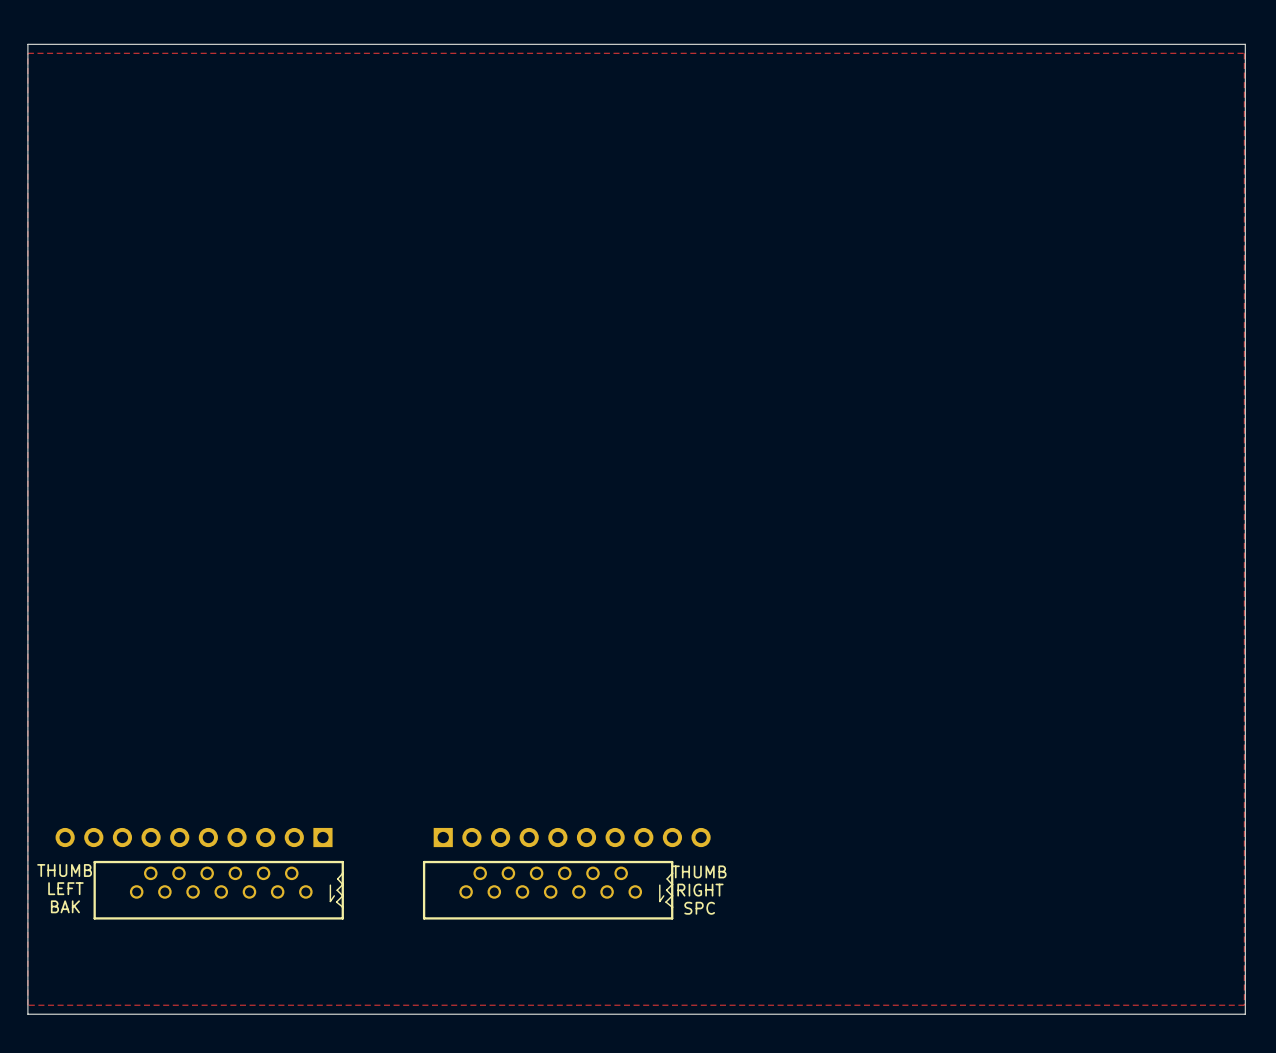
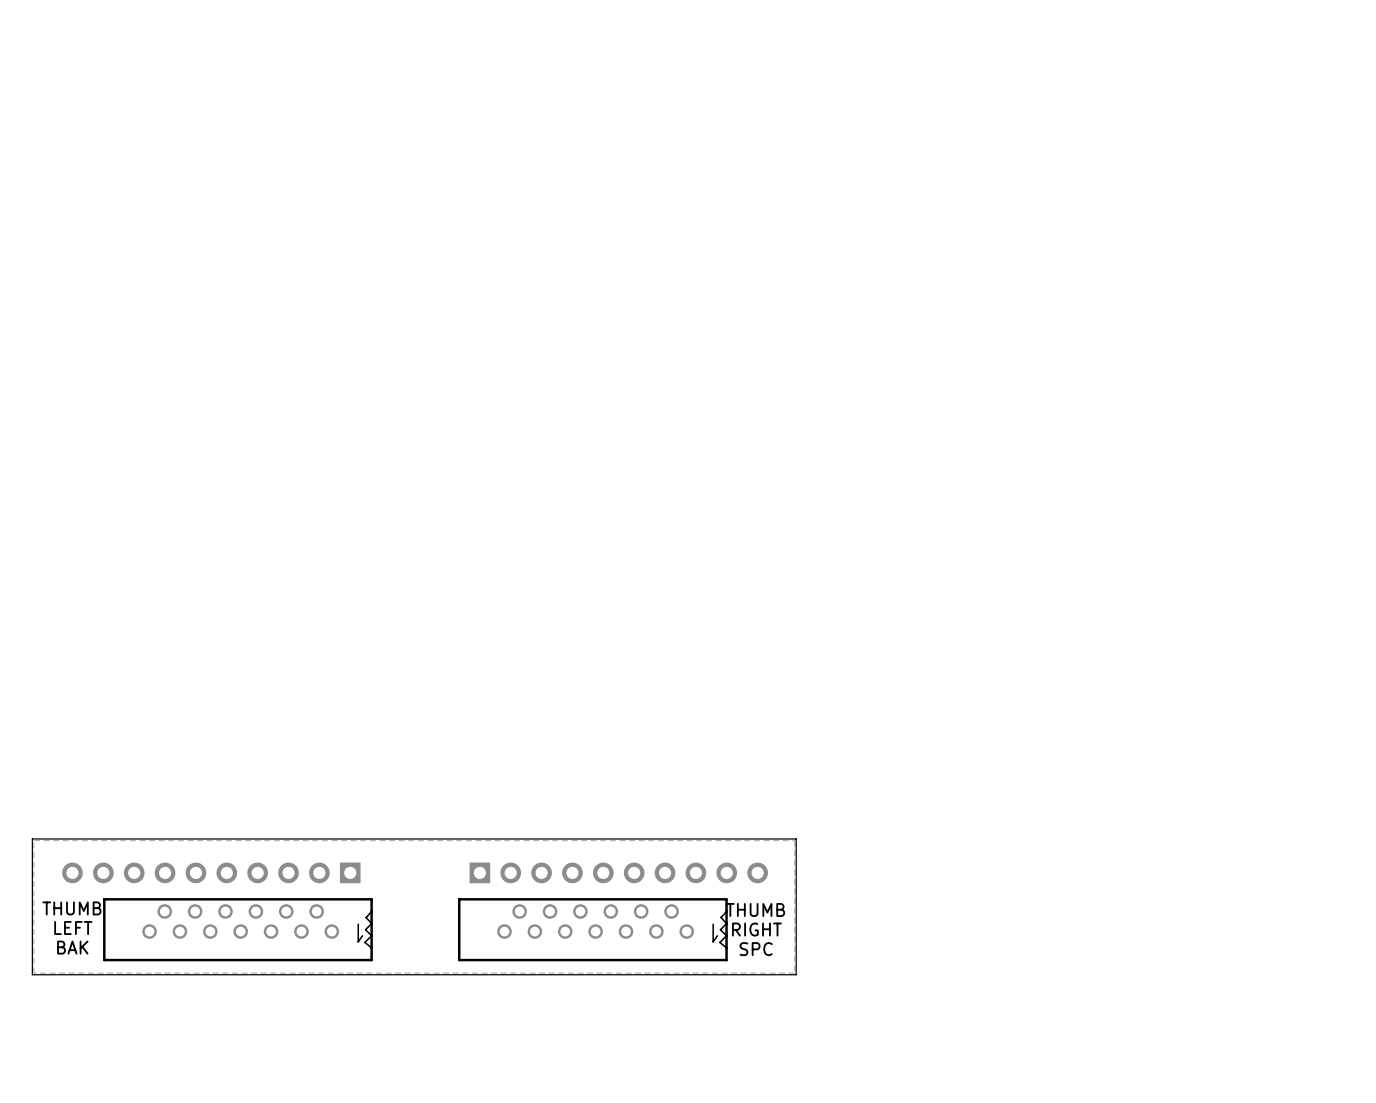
zone outline: (27, 53) (27, 1005) (1244, 1005) (1244, 53) (27, 53) -> none
board edge: (27, 806) (27, 44) (1245, 44) (1245, 1014) (27, 1014) (27, 932) -> (32, 838) (796, 838) (796, 974) (32, 974)
zone outline: none -> (33, 840) (33, 973) (794, 973) (794, 840) (33, 840)

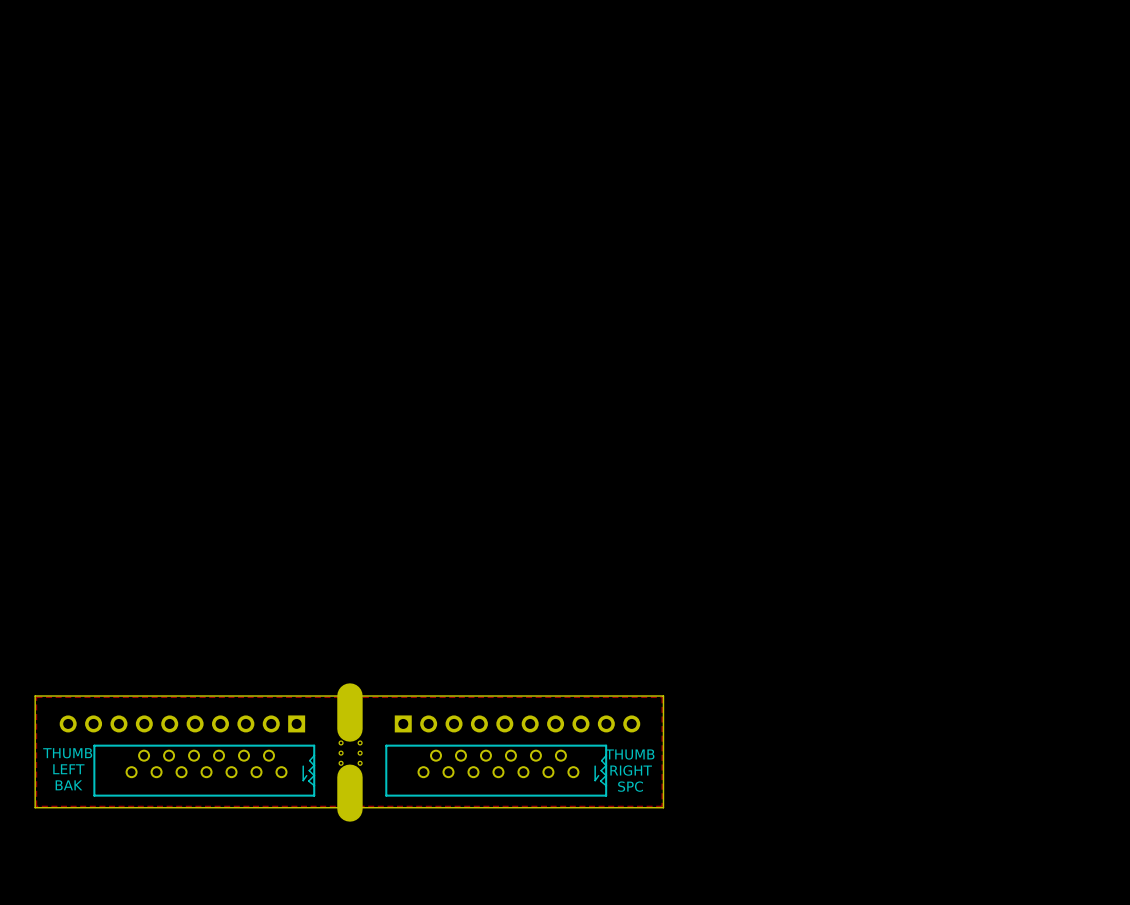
board edge: none -> (349, 696) (349, 729)
part: none -> (350, 753)
board edge: none -> (349, 777) (349, 808)

